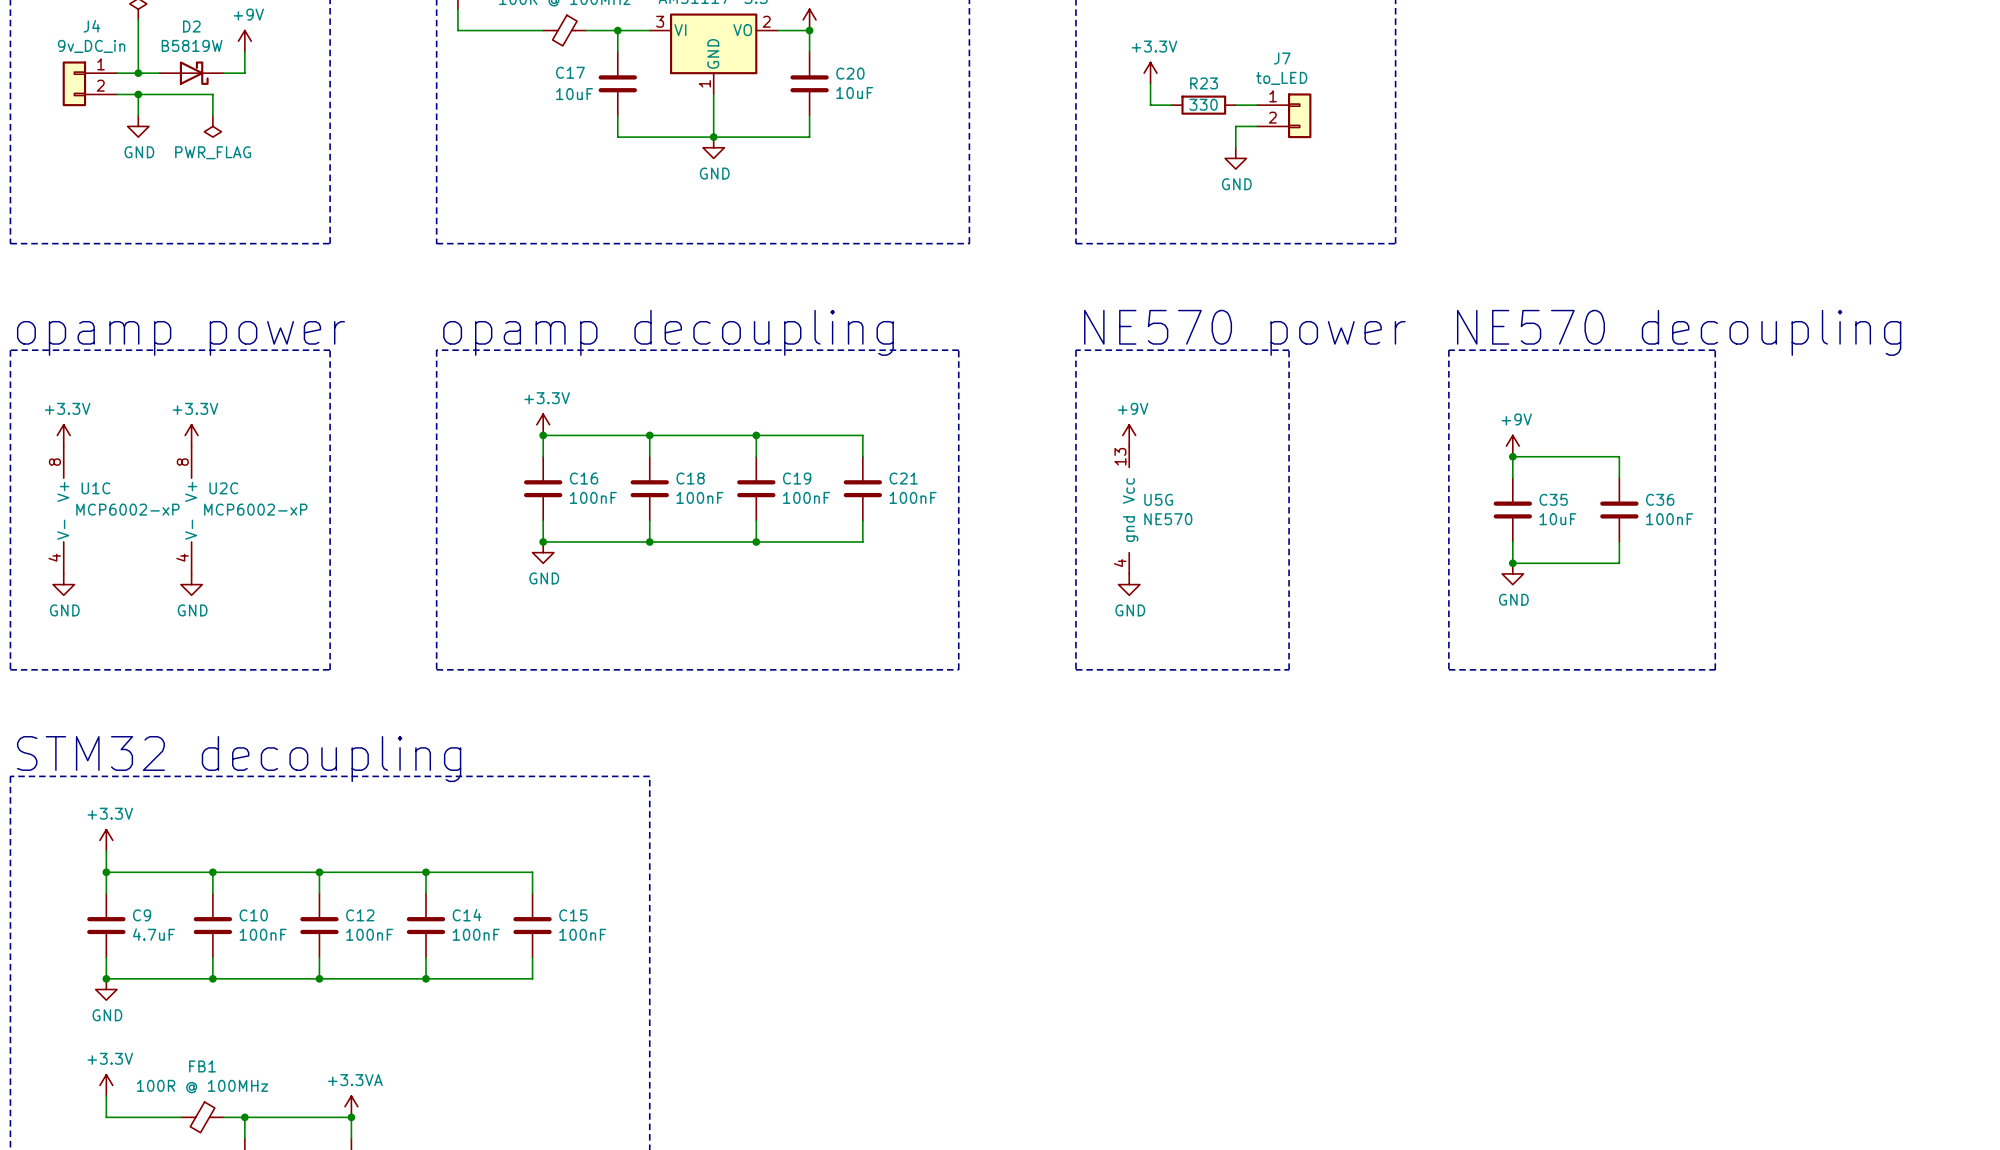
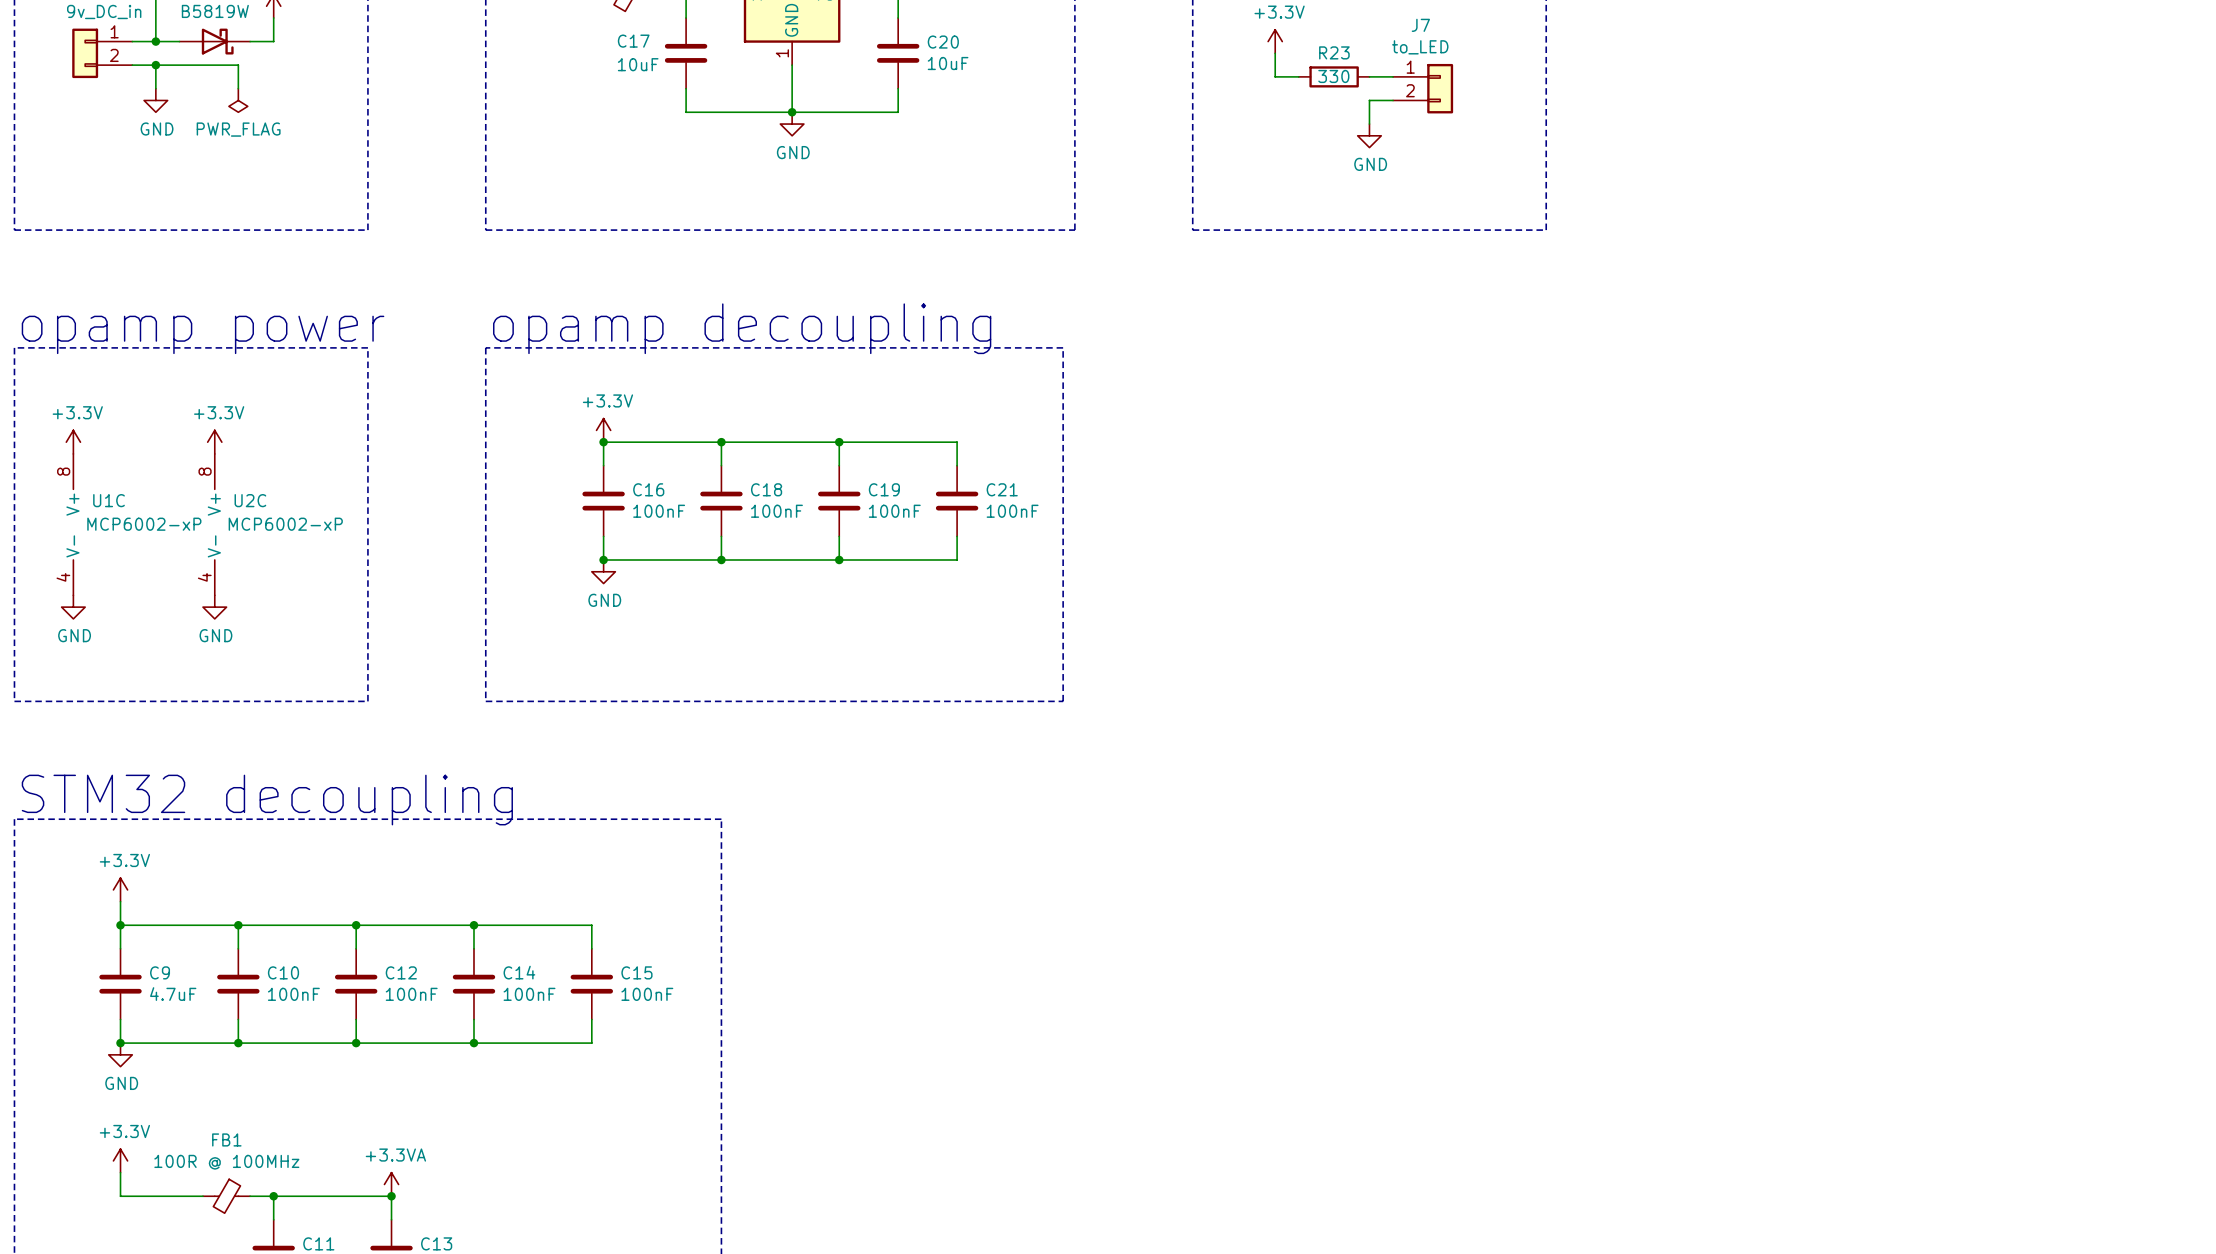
text: NE570 power (1244, 332) -> none
text: NE570 decoupling (1679, 332) -> none
line: (1075, 350) (1075, 669) (1289, 669) (1289, 350) (1075, 350) -> none
line: (1448, 350) (1715, 350) (1715, 669) (1448, 669) (1448, 350) -> none
power symbol: +9V (1129, 435) -> none
power symbol: +9V (1512, 446) -> none
junction: (1512, 456) -> none
wire: (1512, 478) (1512, 456) (1619, 456) (1619, 478) -> none
U5G: NE570 (1129, 510) -> none
C35: 10uF (1512, 510) -> none
C36: 100nF (1619, 510) -> none
wire: (1512, 541) (1512, 563) (1619, 563) (1619, 541) -> none
junction: (1512, 563) -> none
power symbol: GND (1512, 573) -> none
power symbol: GND (1129, 584) -> none

